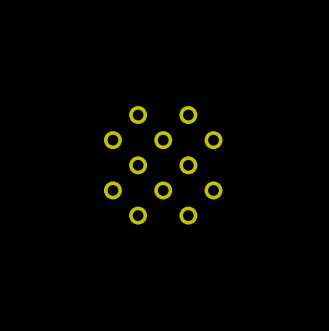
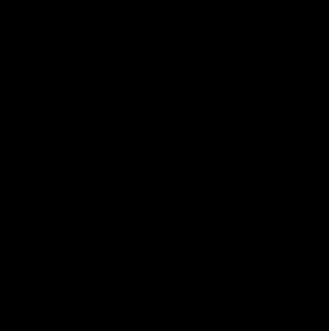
part: (163, 165) -> none

